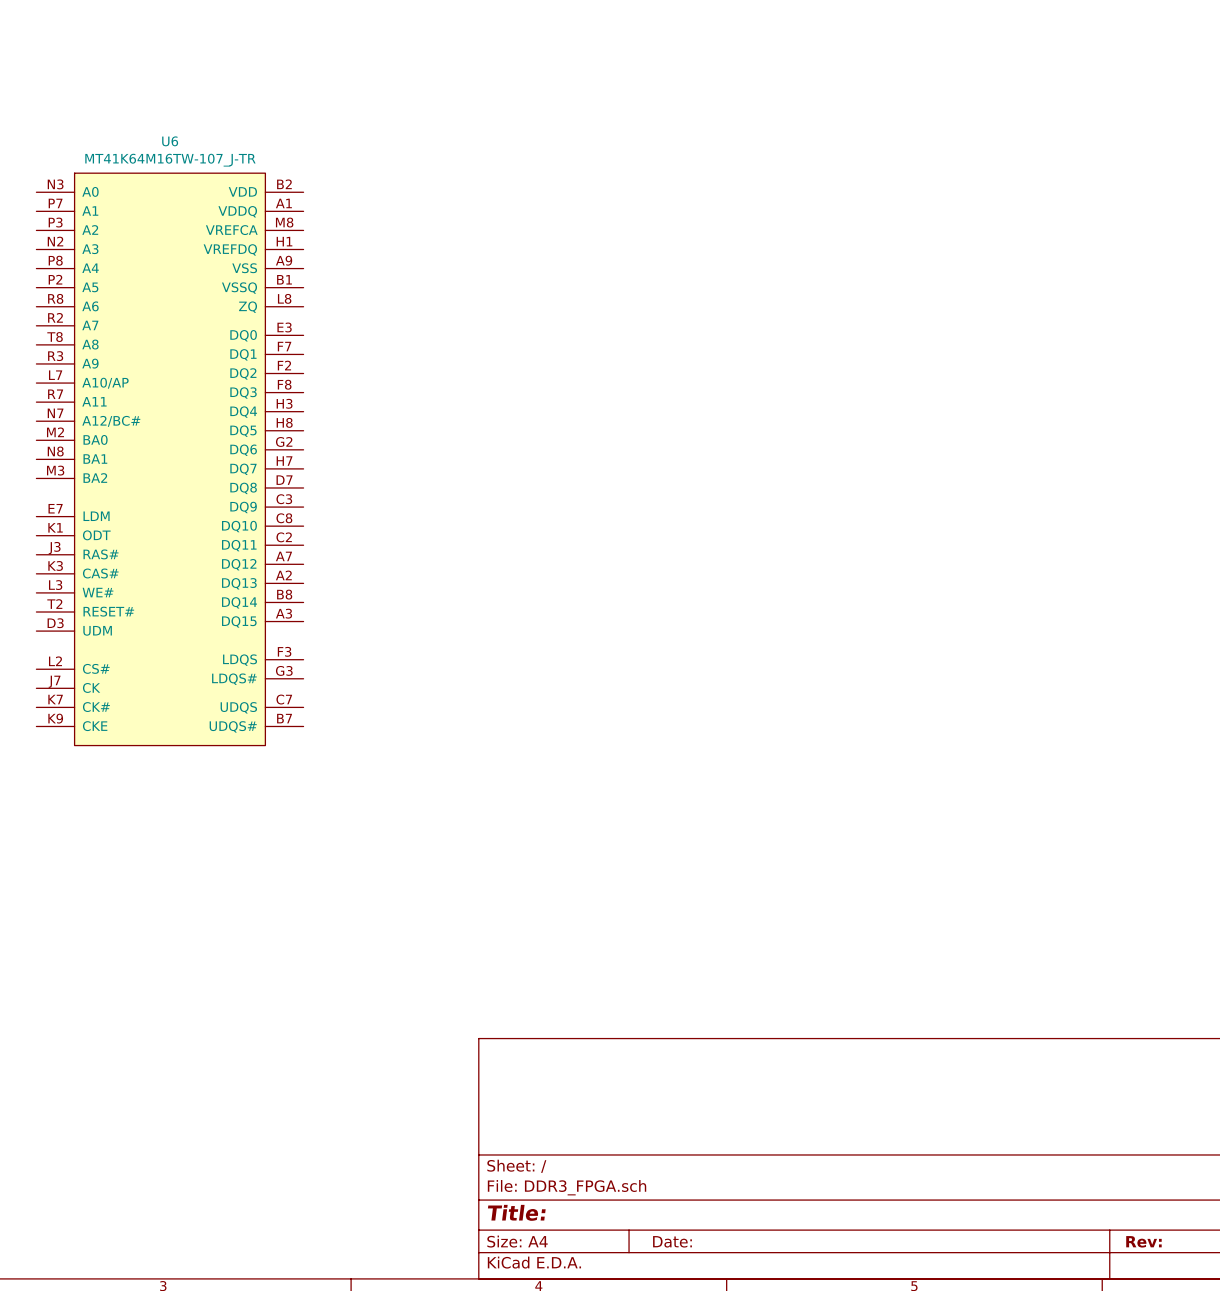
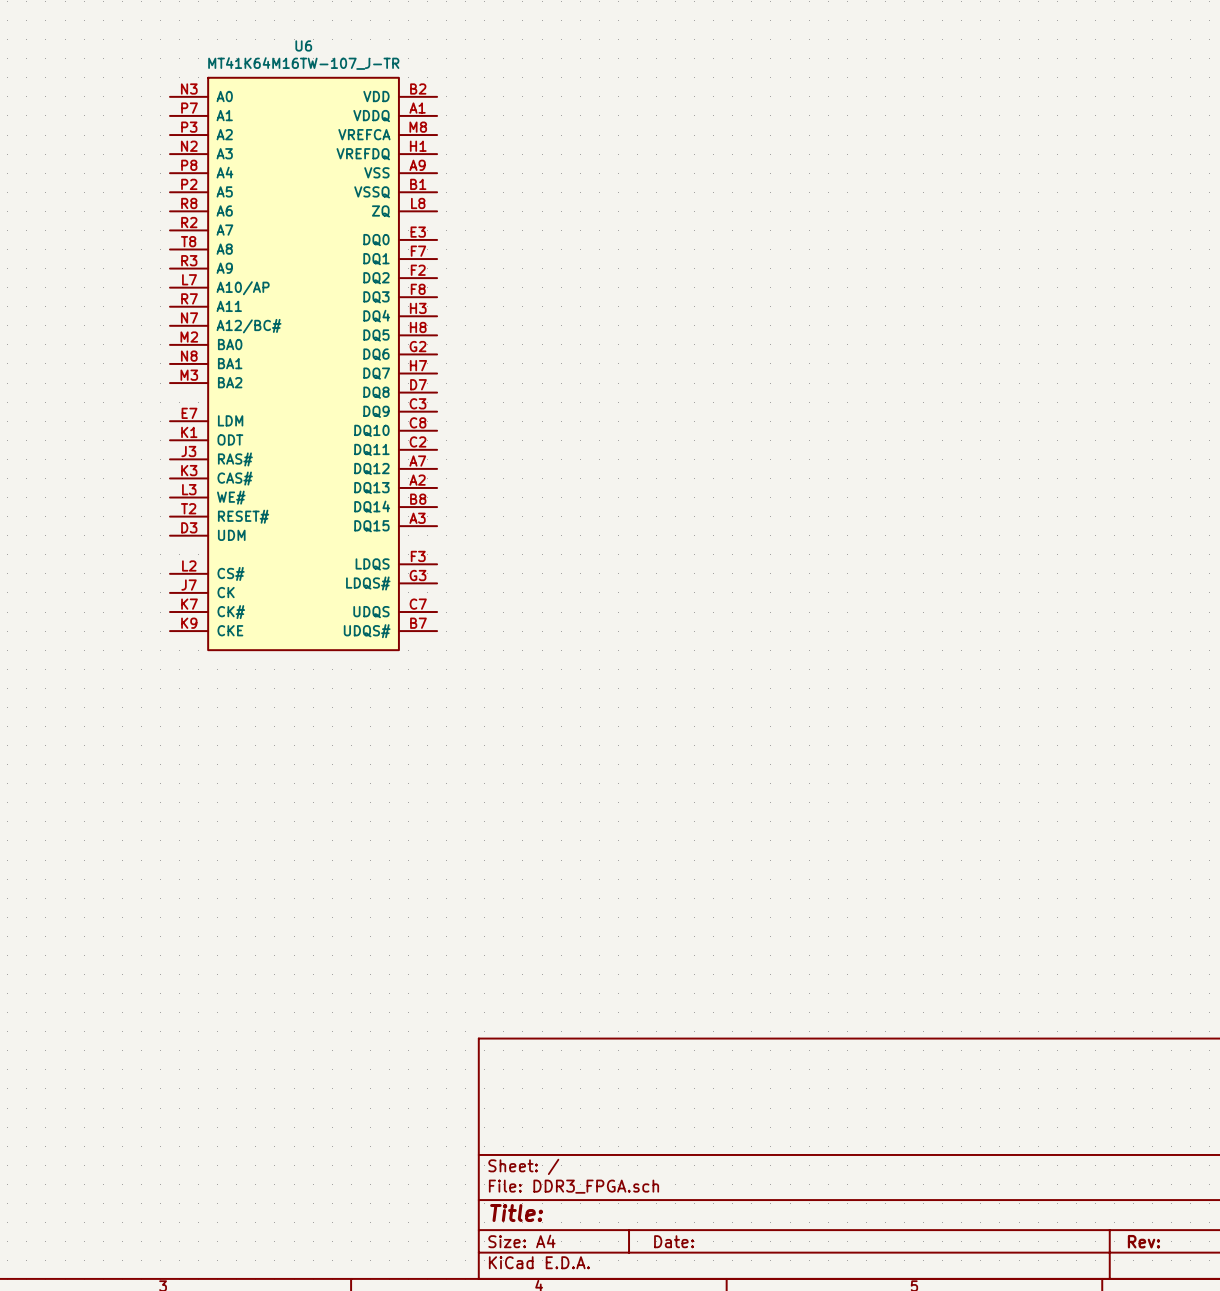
U6 position: (169, 459) -> (303, 363)

